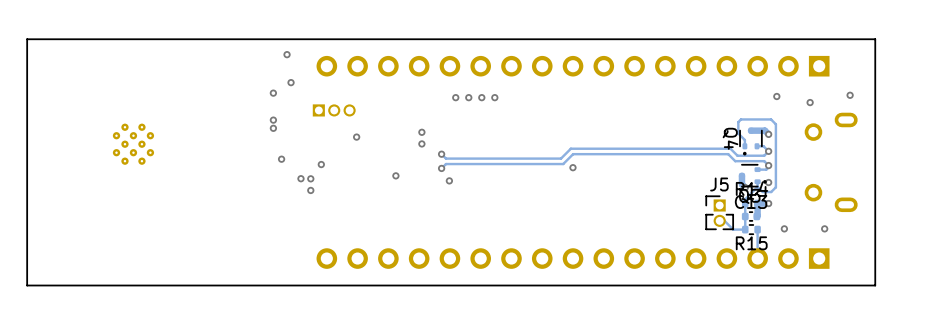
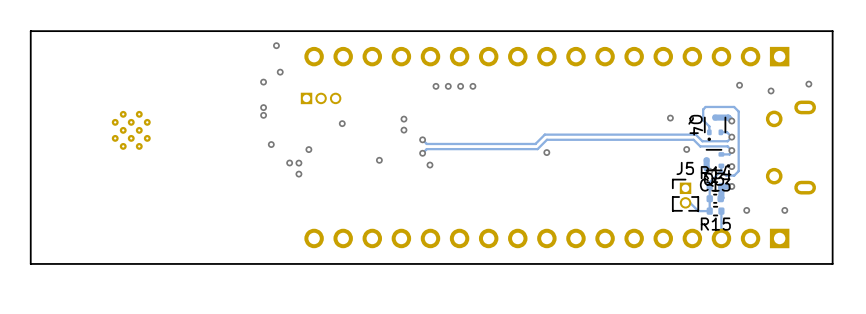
via: none -> (670, 118)
via: none -> (686, 149)

